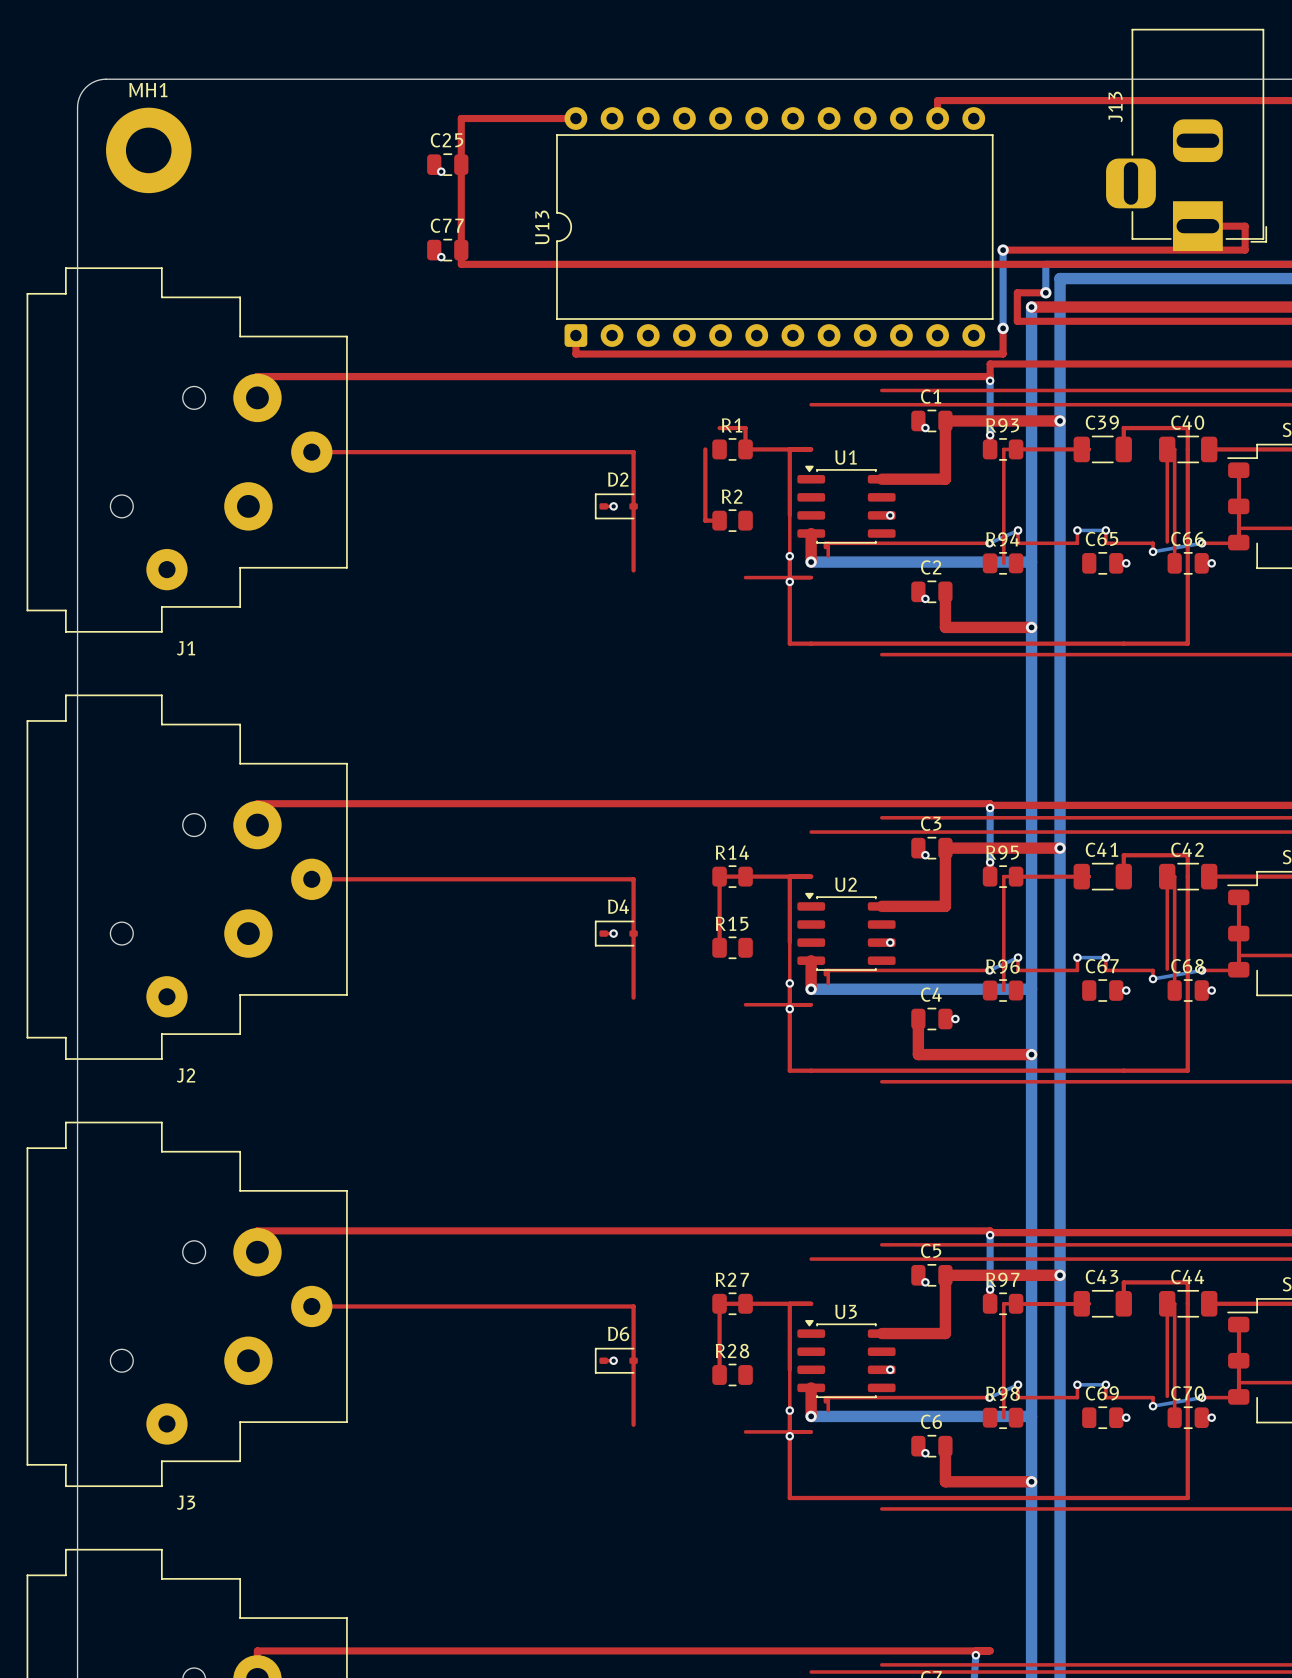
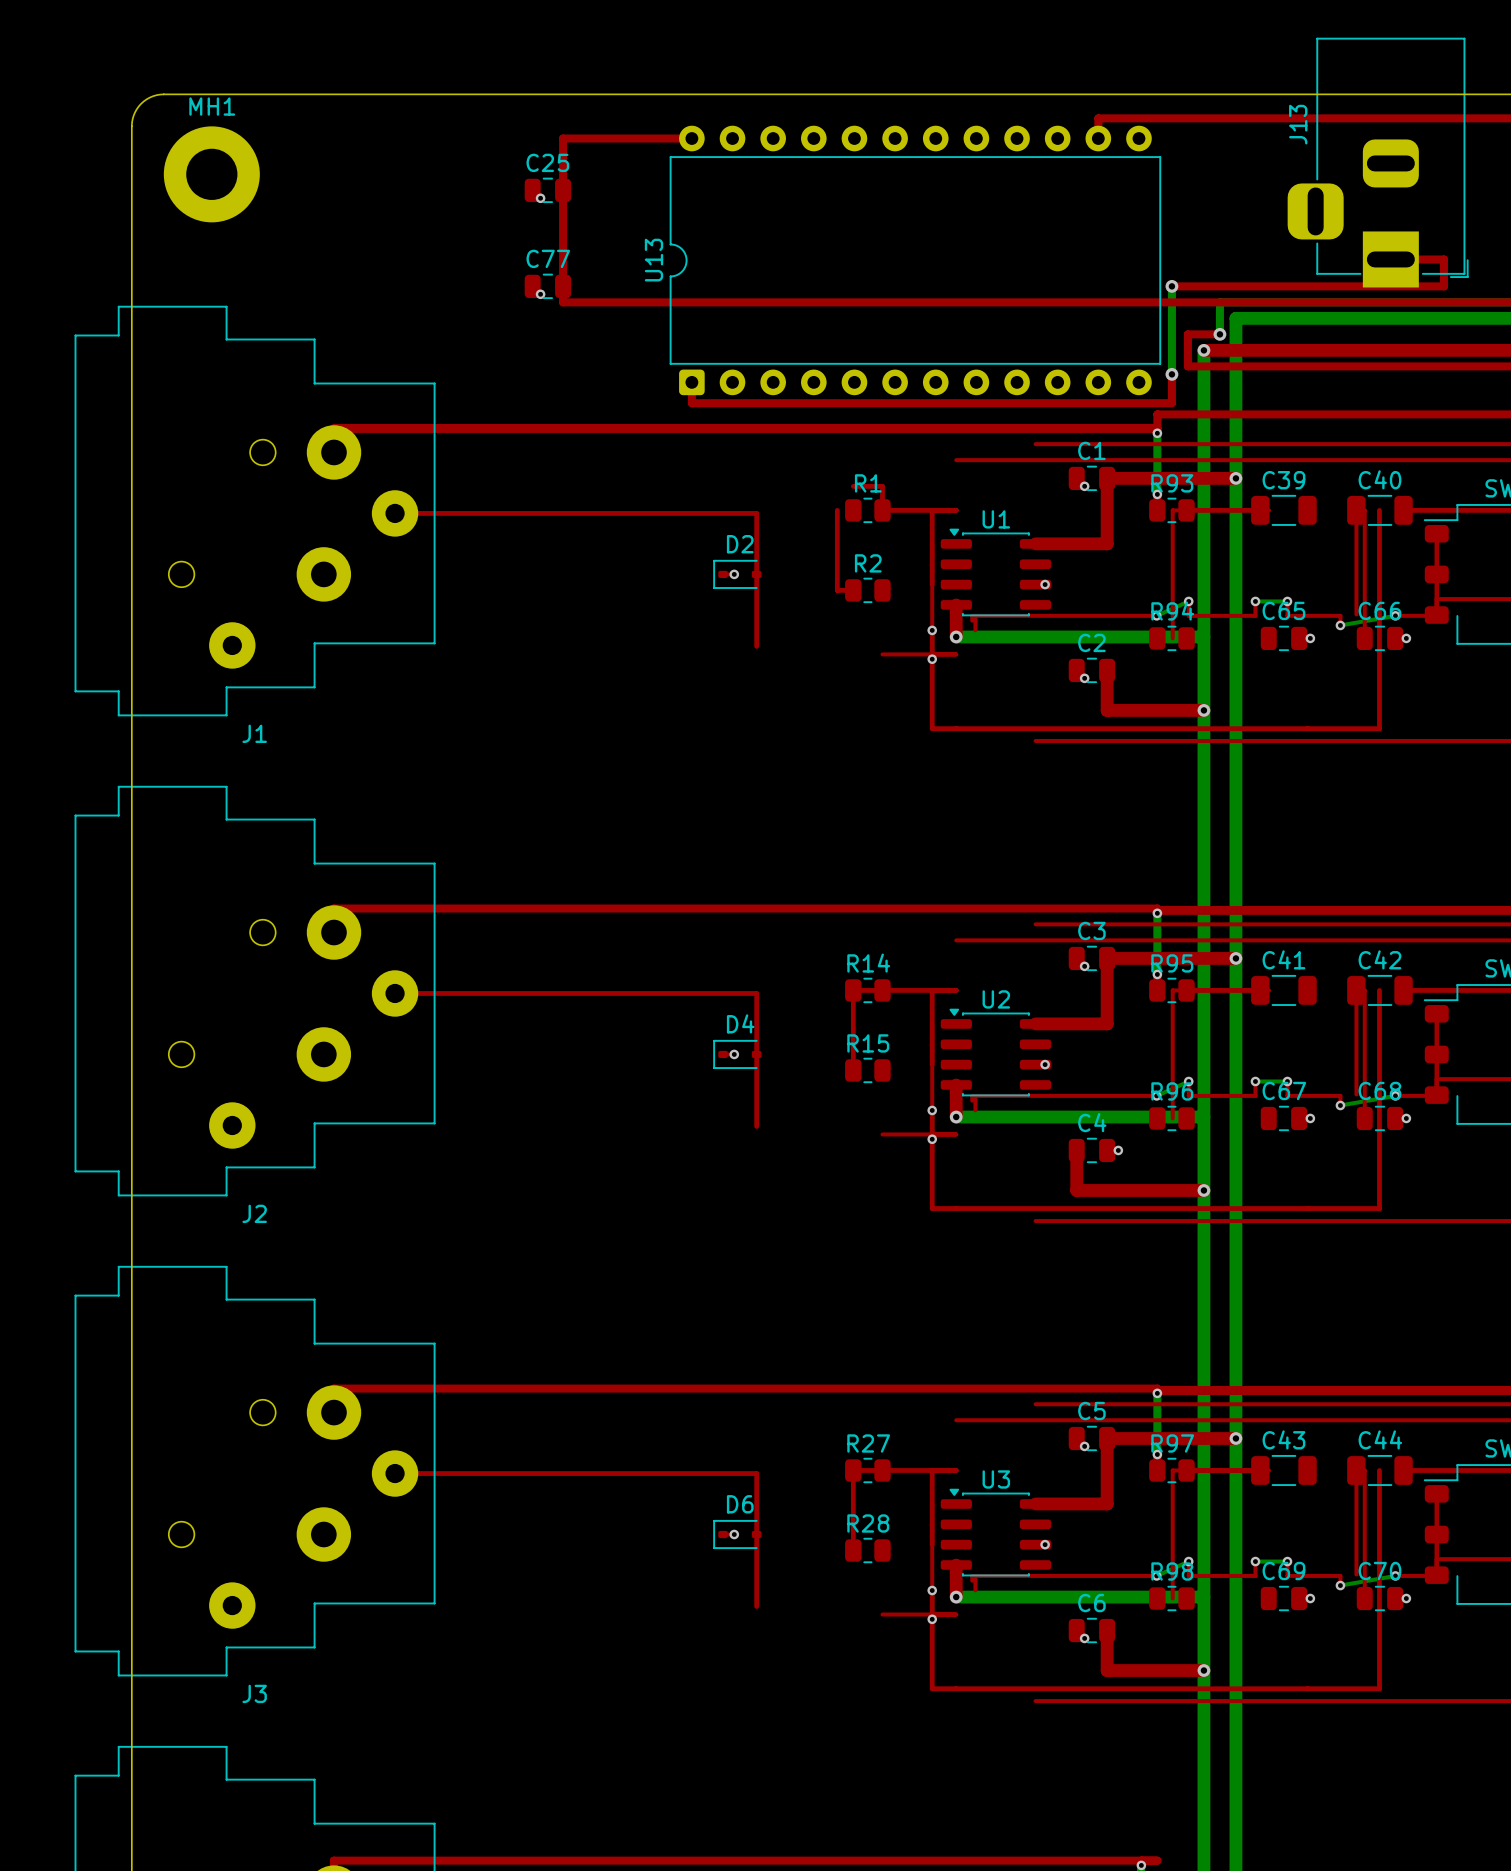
top track: (1123, 449) (1123, 428) (1187, 428) (1187, 449) -> none
top track: (1123, 876) (1123, 855) (1187, 855) (1187, 876) -> none
top track: (1123, 1303) (1123, 1282) (1187, 1282) (1187, 1303) -> none

